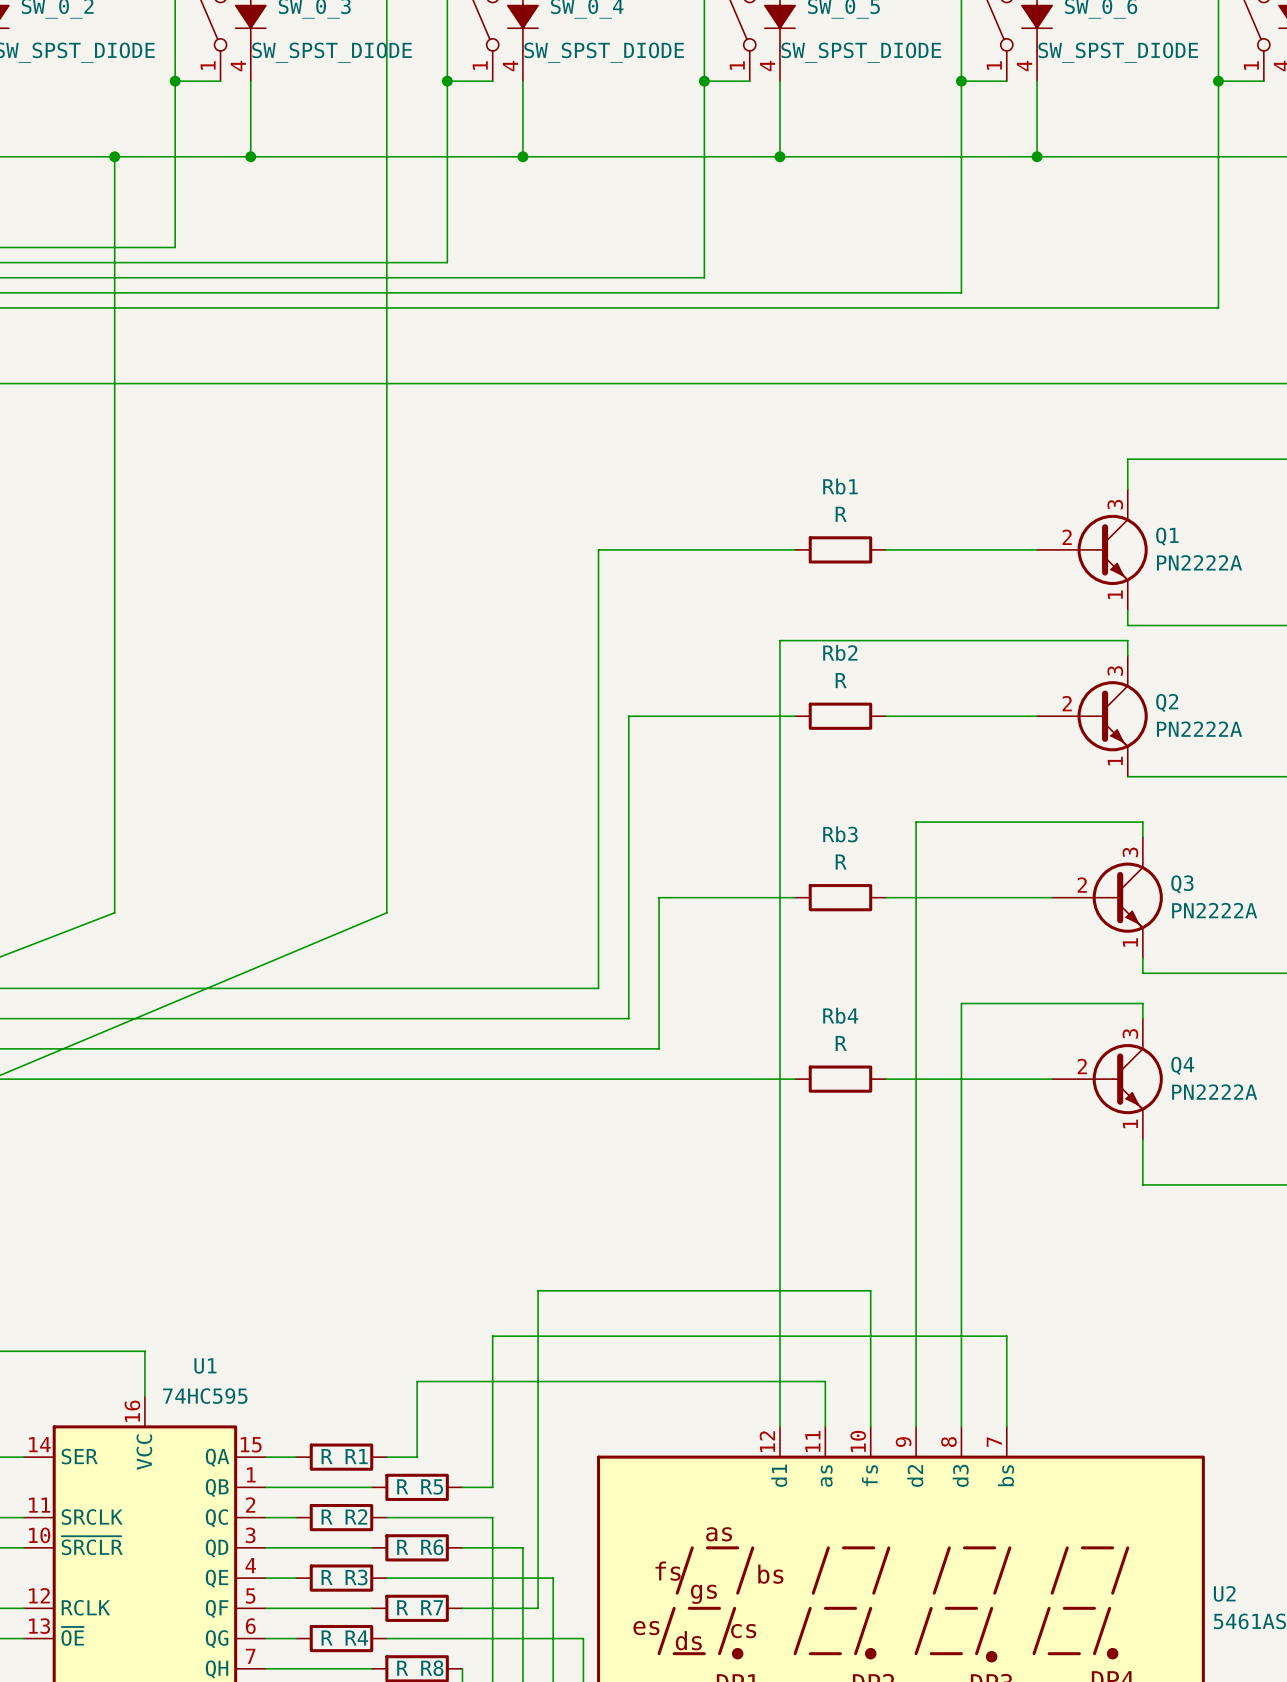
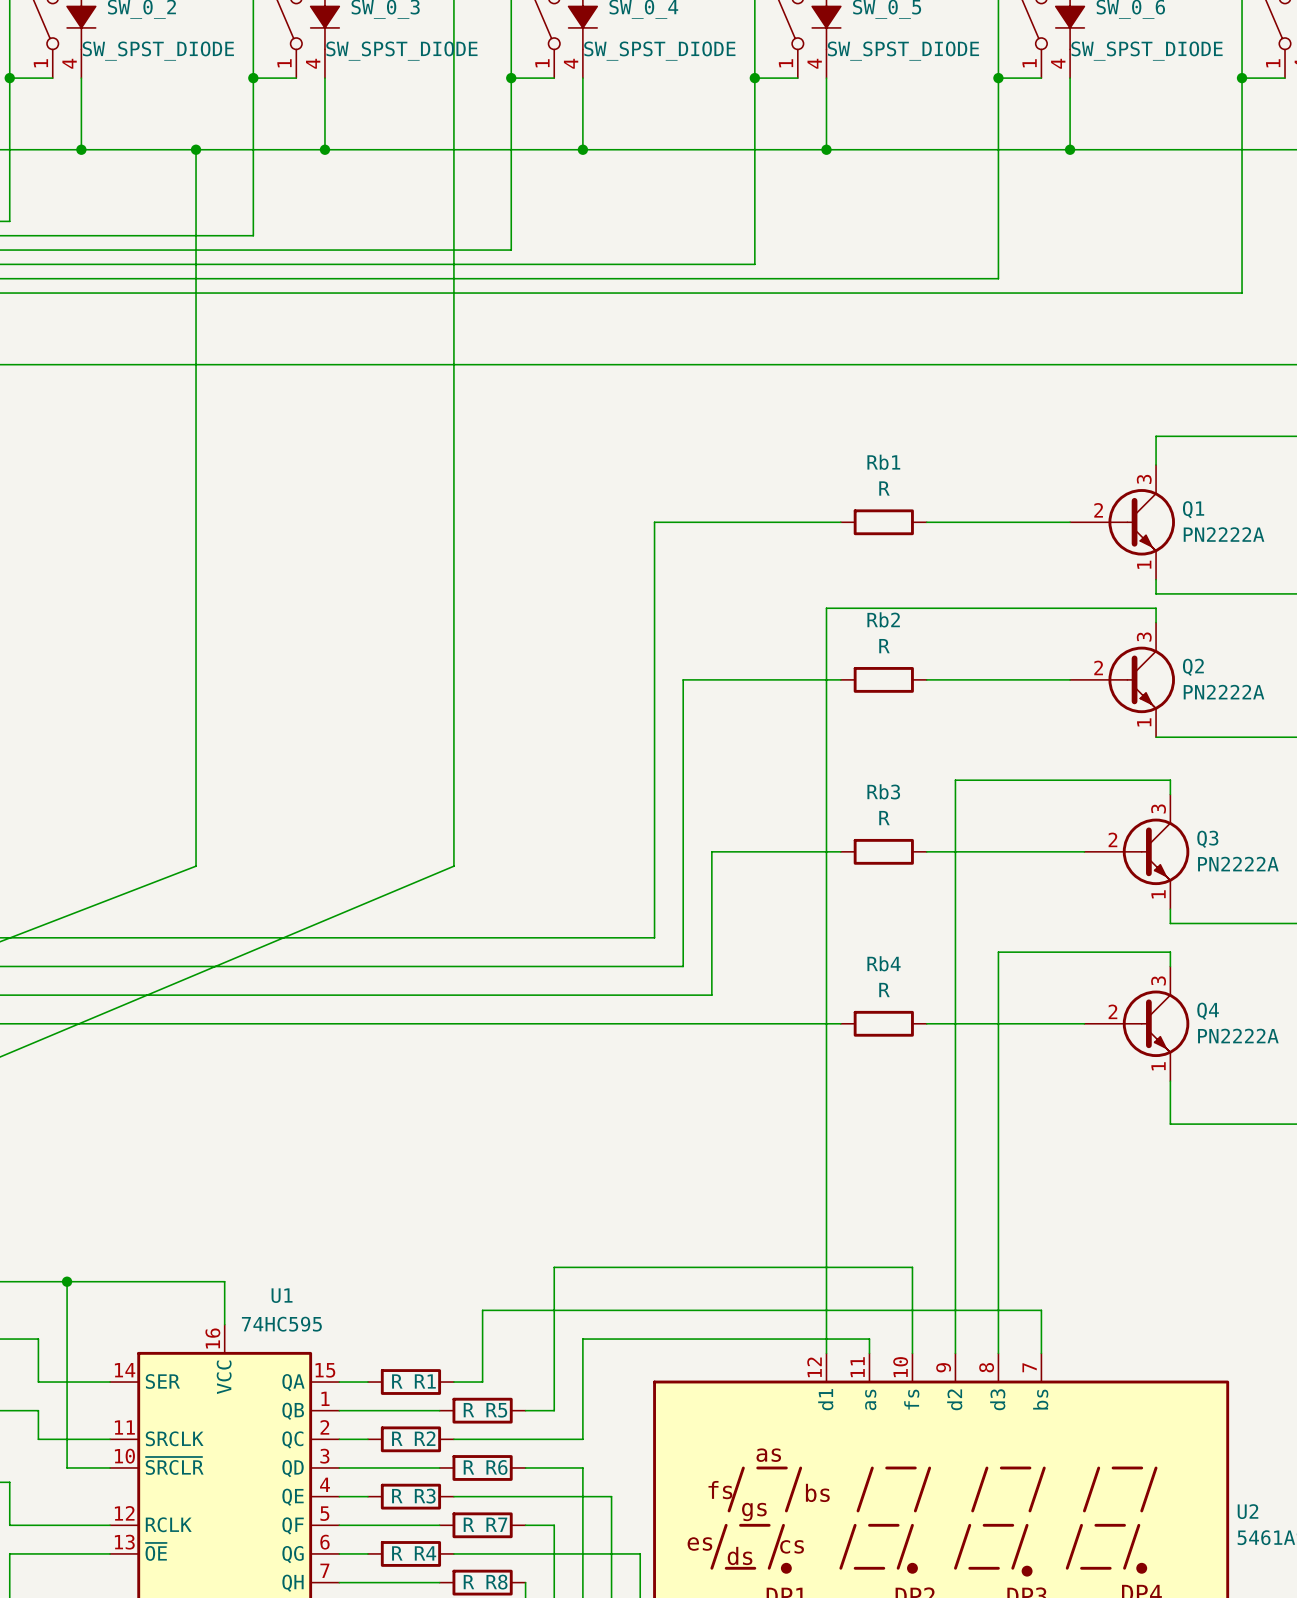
wire: (825, 1381) (825, 1411) -> (869, 1310) (1041, 1310)
wire: (1006, 1381) (1006, 1336) (870, 1336) (870, 1290) (538, 1290) (538, 1608) (492, 1608) (492, 1517) -> (869, 1339) (582, 1339) (582, 1439) (554, 1439)

